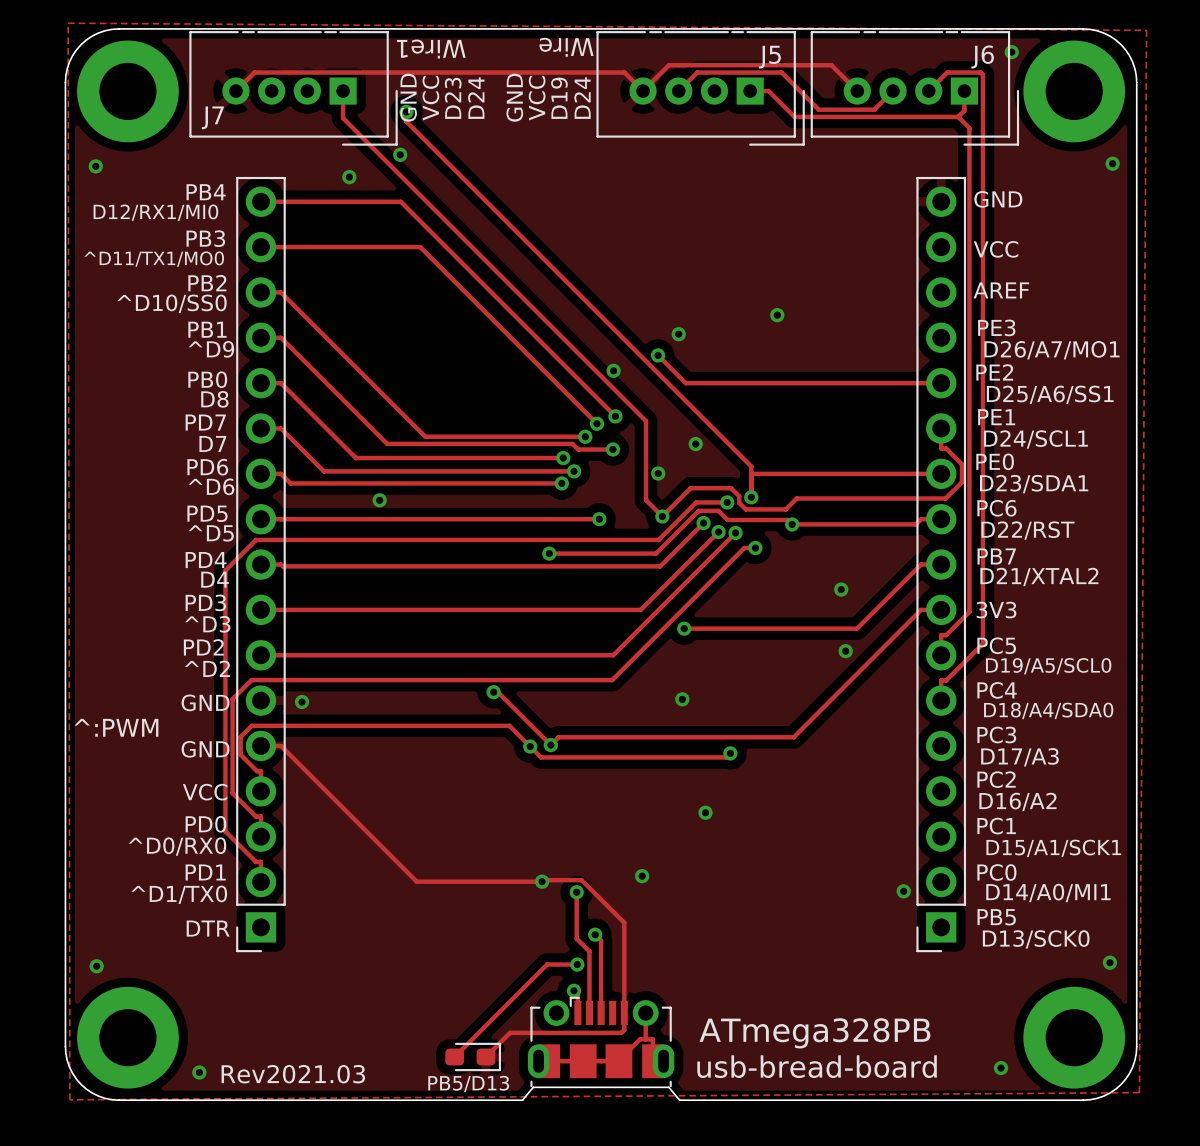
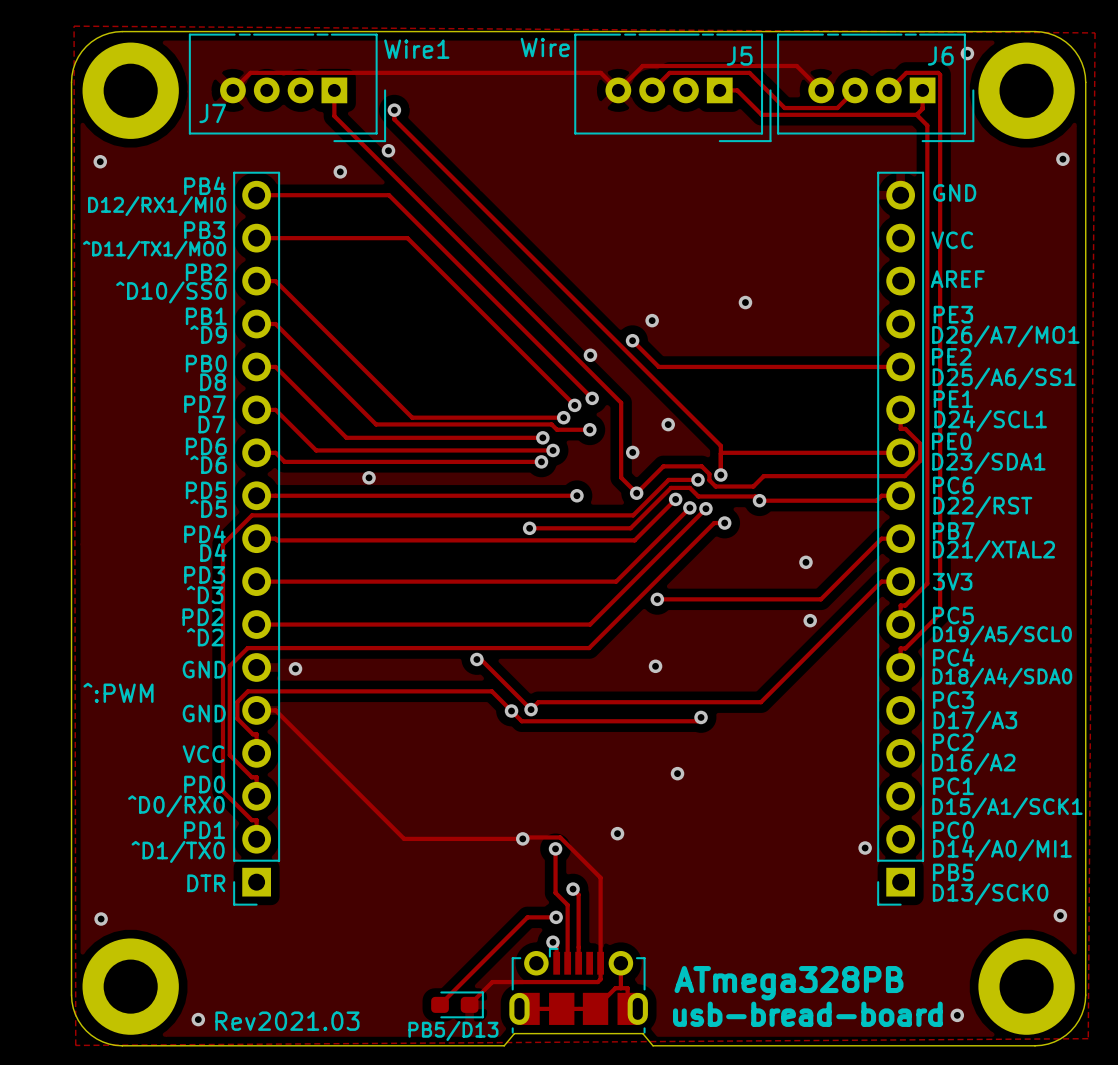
text rotation: 0° (566, 47) -> 180° (545, 47)
text rotation: 0° (431, 49) -> 180° (416, 49)
text: GND (408, 97) -> none
text: GND (514, 97) -> none
text: VCC (430, 98) -> none
text: D23 (453, 98) -> none
text: D24 (476, 98) -> none
text: VCC (537, 98) -> none
text: D19 (559, 98) -> none
text: D24 (582, 98) -> none

